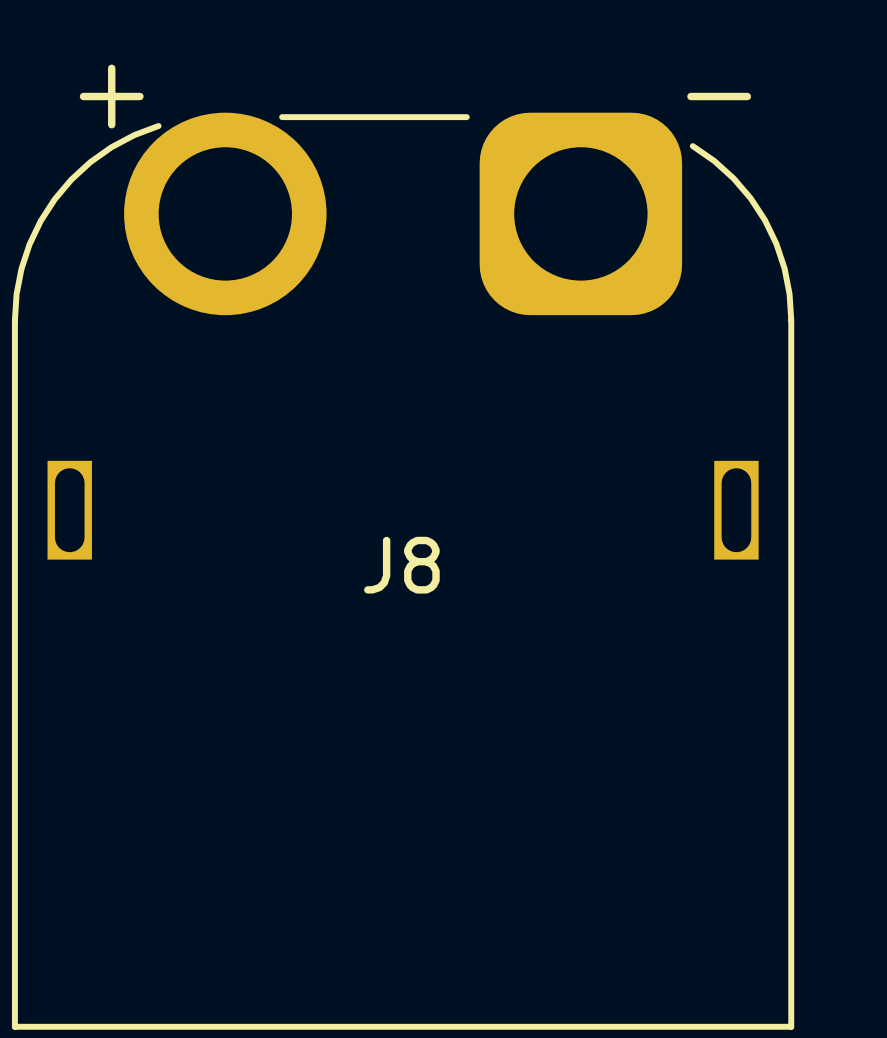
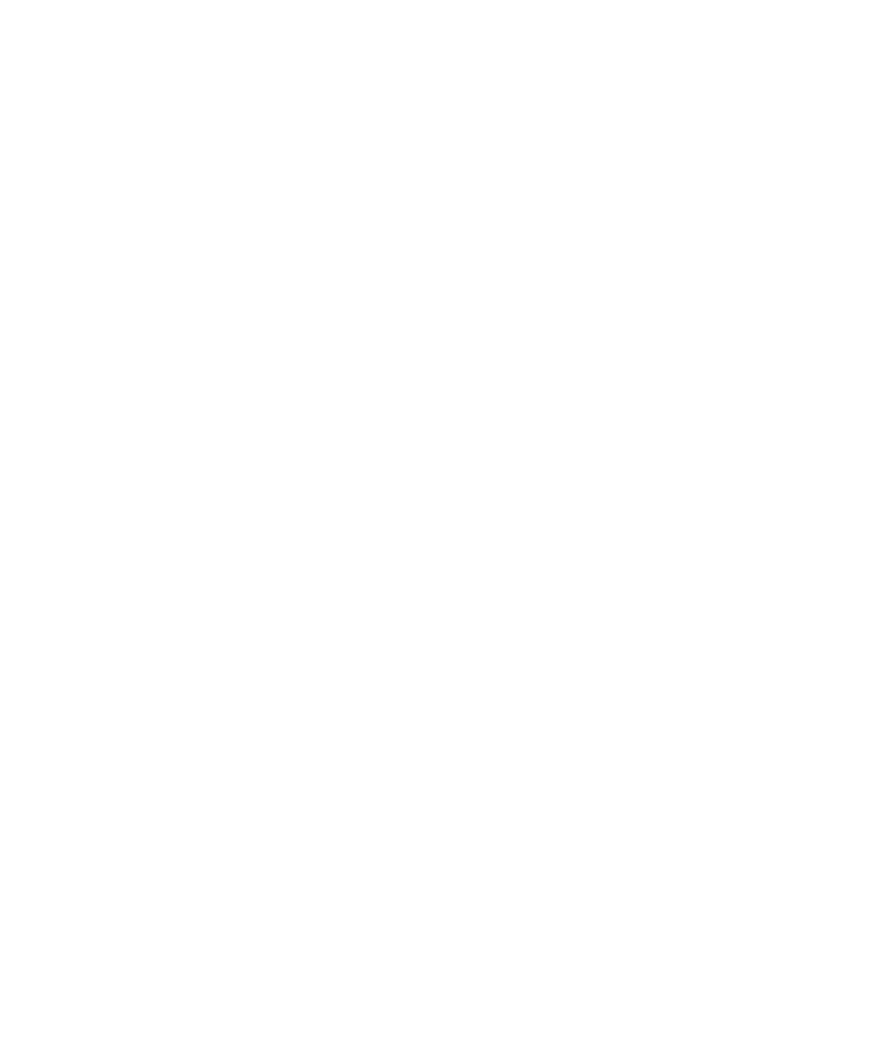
J8: (403, 571) -> none

